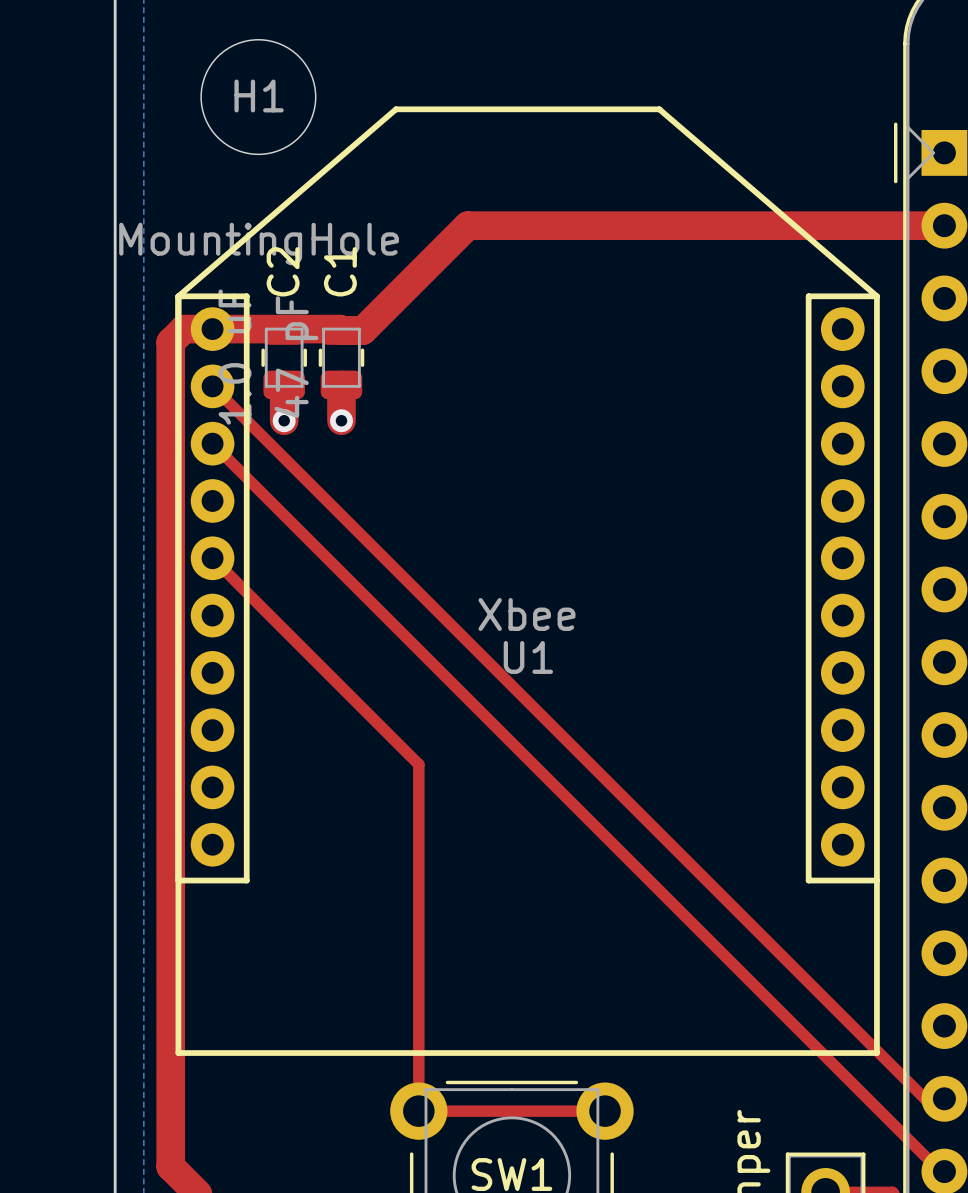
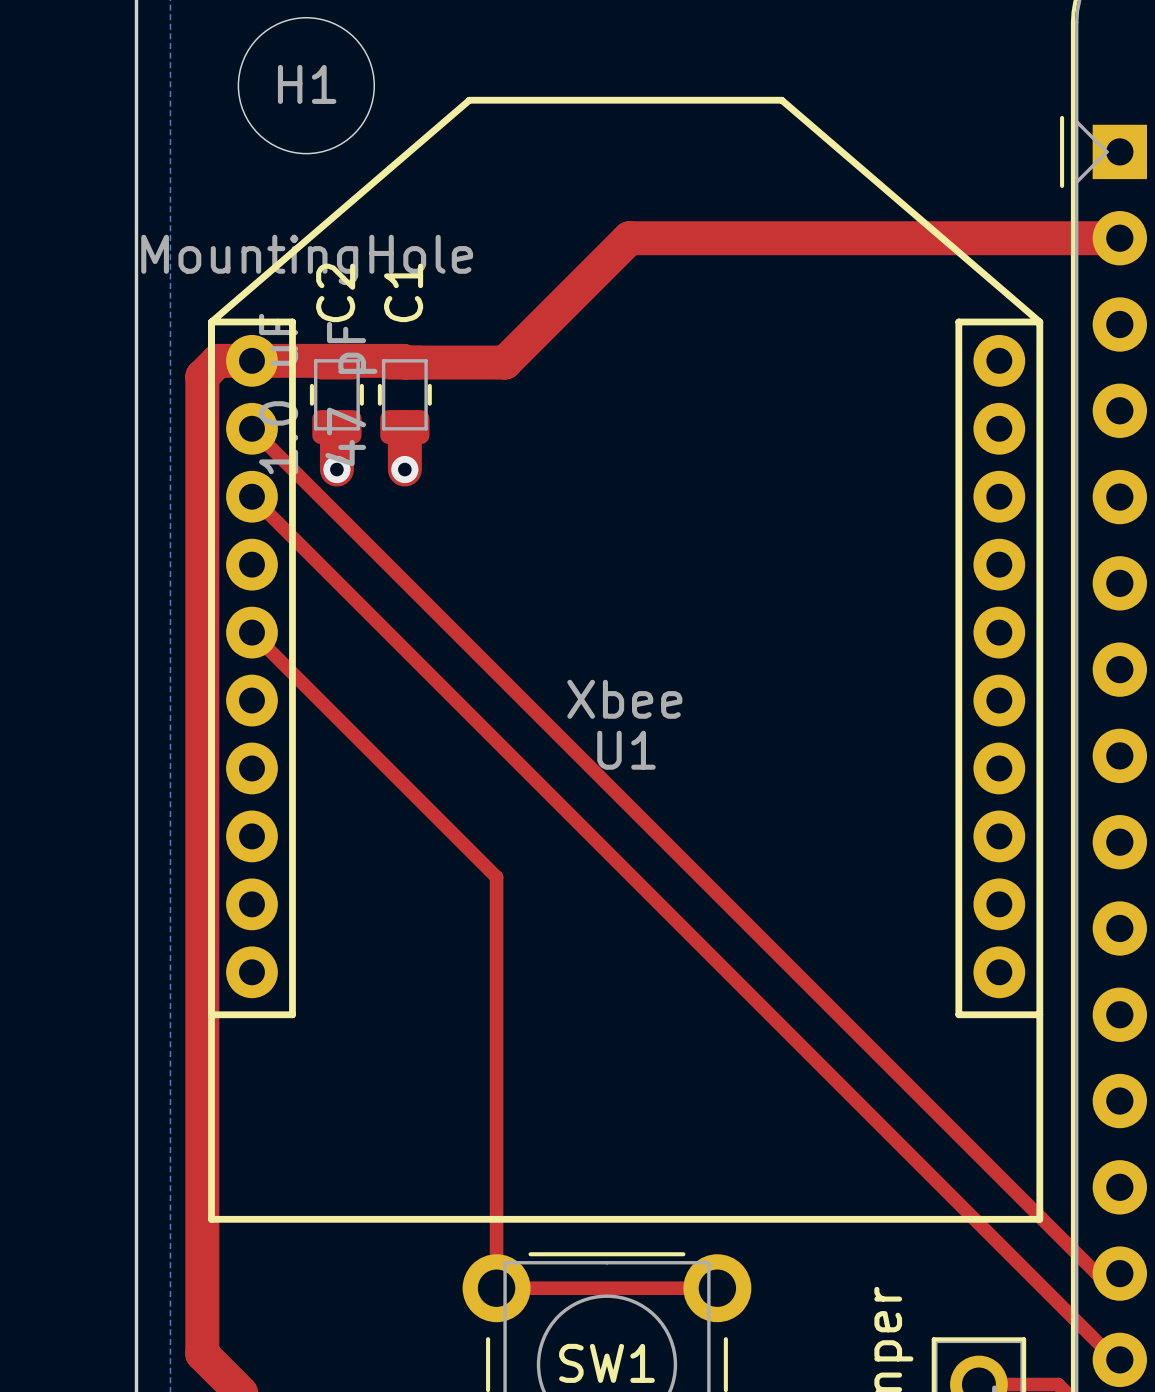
top track: (530, 225) (467, 225) (362, 330) -> (629, 238) (505, 362) (430, 362)

